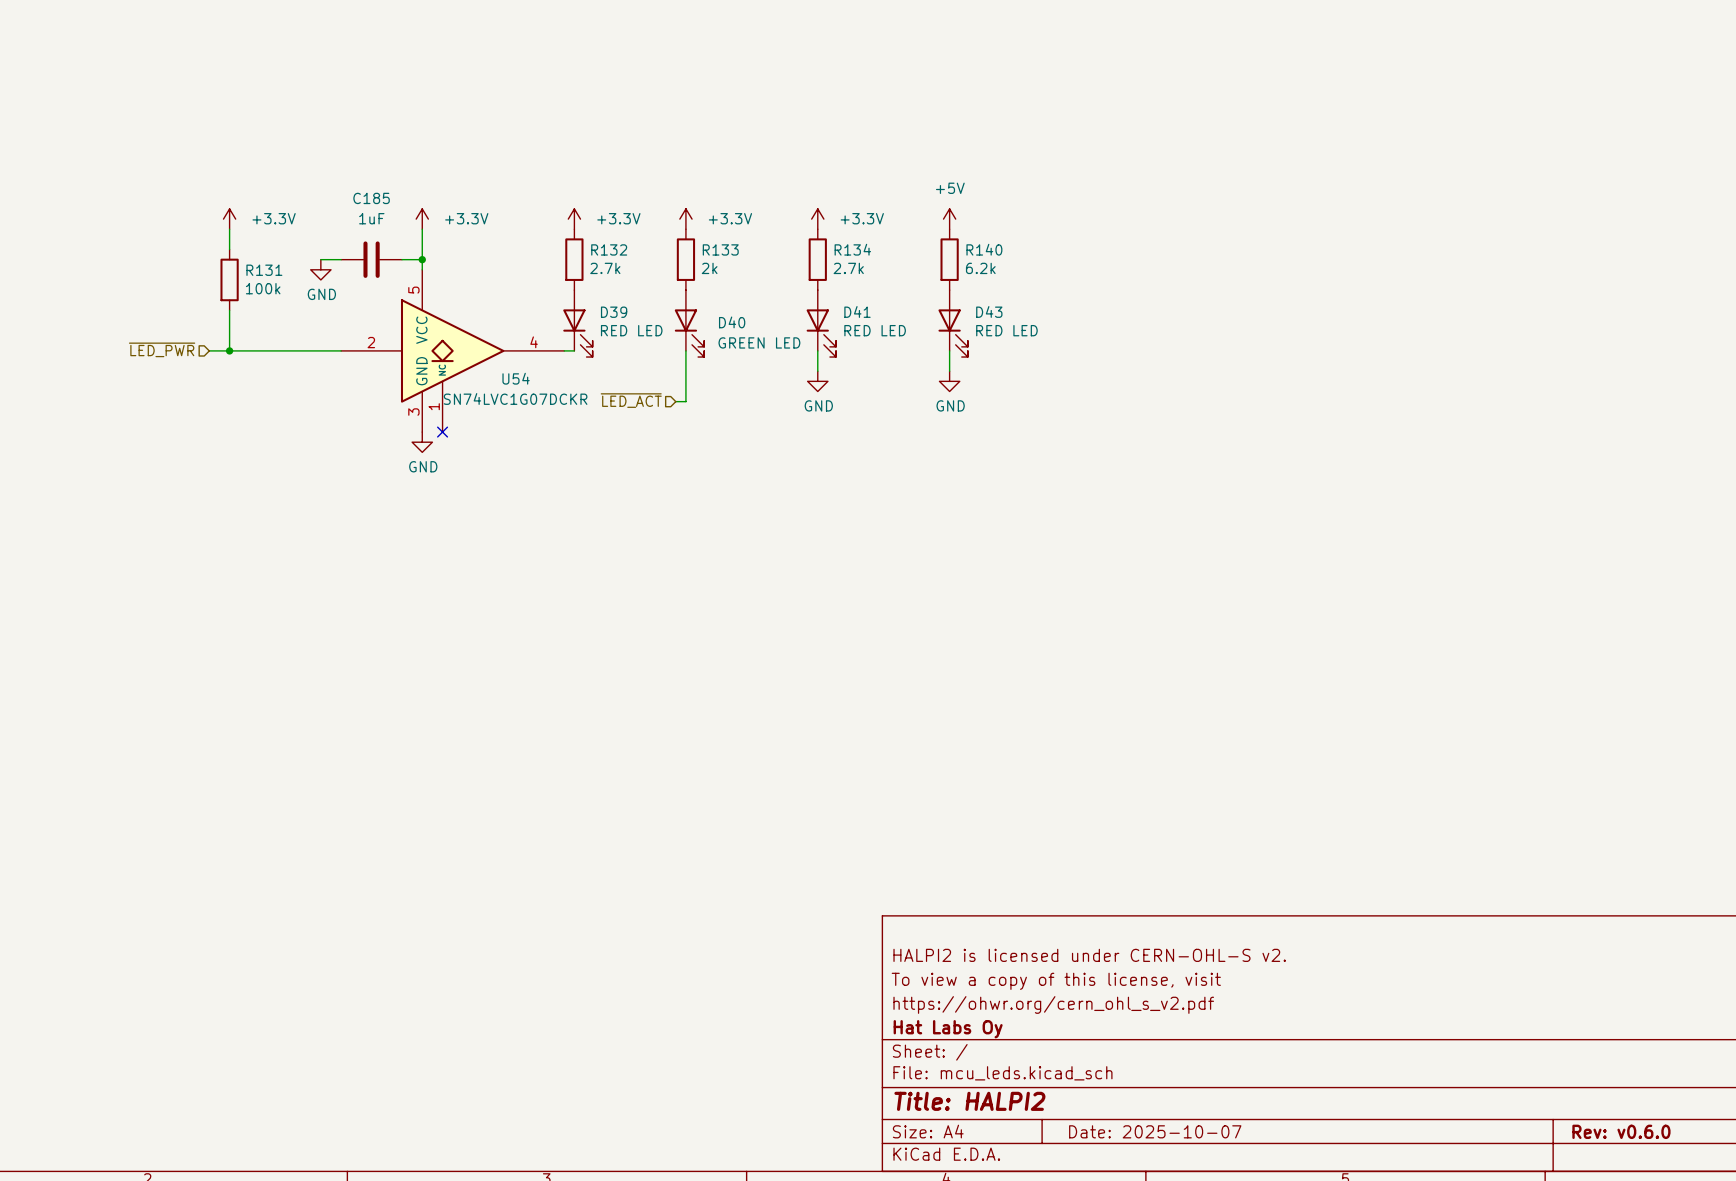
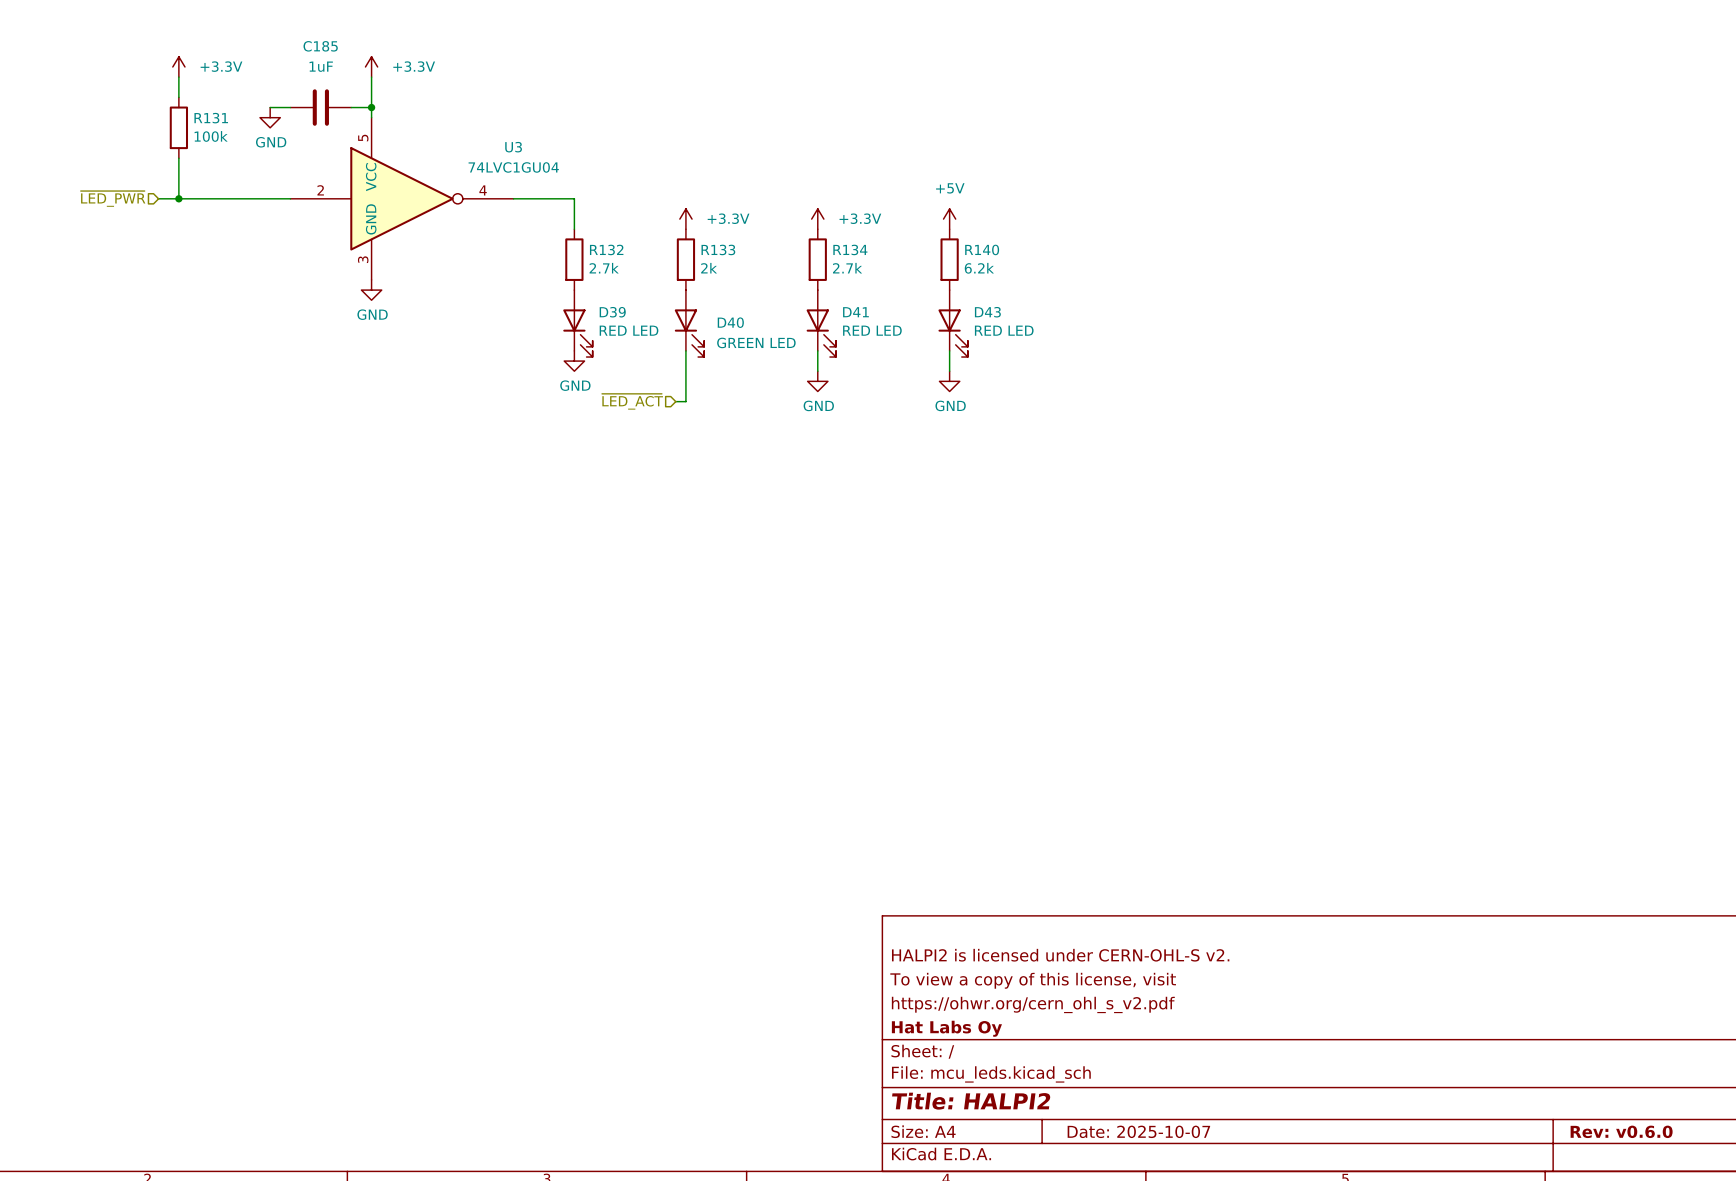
power symbol: none -> +3.3V (178, 66)
power symbol: none -> +3.3V (371, 66)
junction: none -> (371, 107)
power symbol: none -> GND (270, 117)
junction: none -> (178, 198)
U3: none -> 74LVC1GU04 (401, 198)
wire: none -> (513, 198) (574, 198) (574, 229)
power symbol: +3.3V (229, 219) -> none
power symbol: +3.3V (422, 219) -> none
power symbol: +3.3V (574, 219) -> none
wire: (229, 229) (229, 249) -> (178, 77) (178, 97)
wire: (422, 229) (422, 269) -> (371, 77) (371, 117)
wire: (320, 259) (341, 259) -> (270, 107) (290, 107)
C185 position: (371, 259) -> (320, 107)
wire: (401, 259) (422, 259) -> (351, 107) (371, 107)
junction: (422, 259) -> none
power symbol position: GND (320, 269) -> GND (371, 290)
R131 position: (229, 279) -> (178, 127)
wire: (229, 310) (229, 350) -> (178, 158) (178, 198)
hierarchical label position: ~{LED_PWR} (162, 349) -> ~{LED_PWR} (113, 198)
wire: (209, 350) (341, 350) -> (158, 198) (290, 198)
junction: (229, 350) -> none
U54: SN74LVC1G07DCKR (452, 350) -> none
wire: (564, 350) (574, 350) -> none
power symbol: none -> GND (574, 361)
no-connect mark: (442, 432) -> none
power symbol: GND (422, 442) -> none

